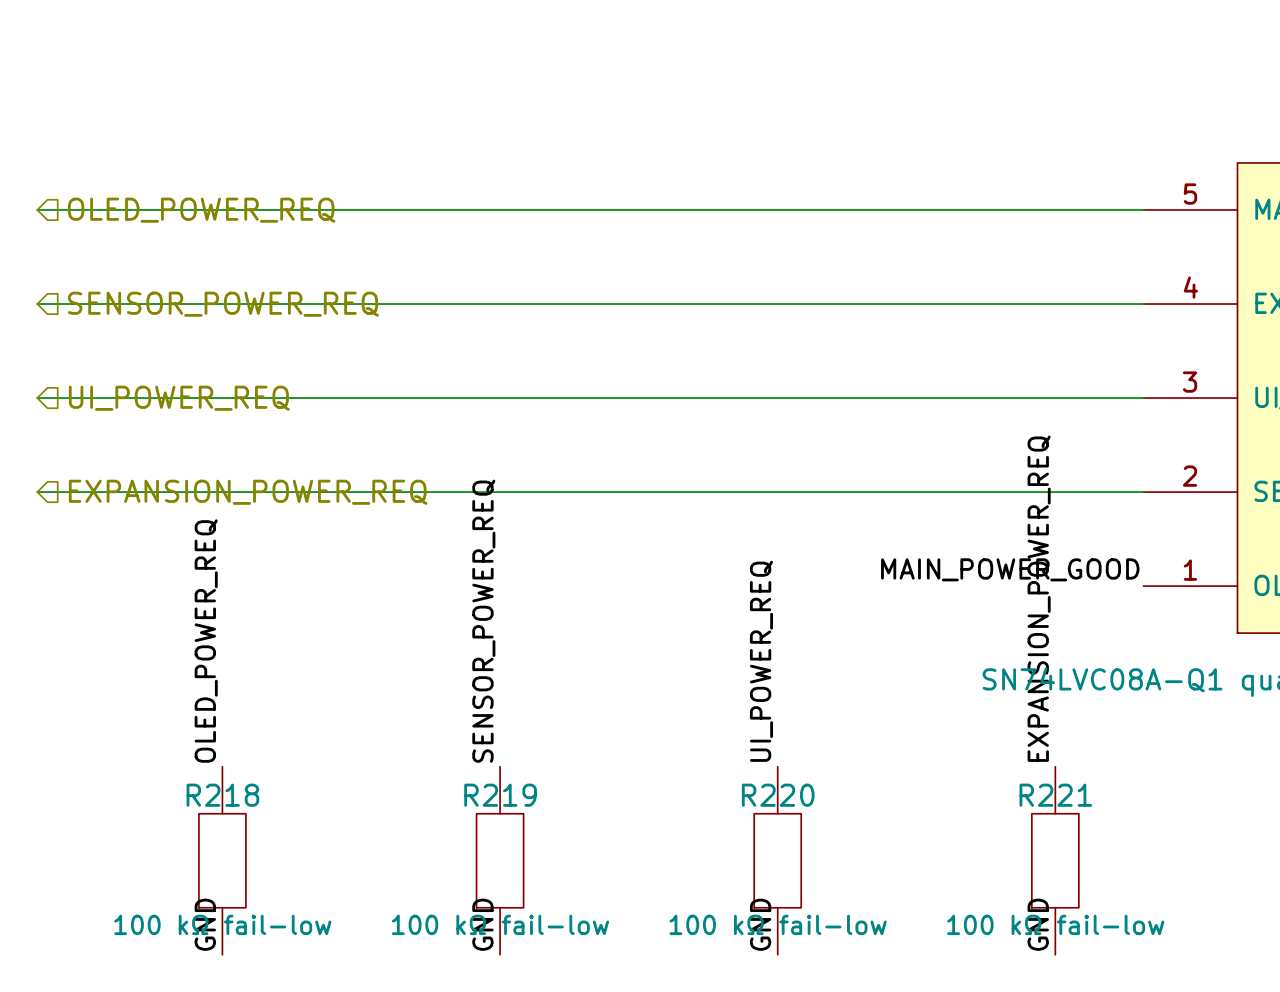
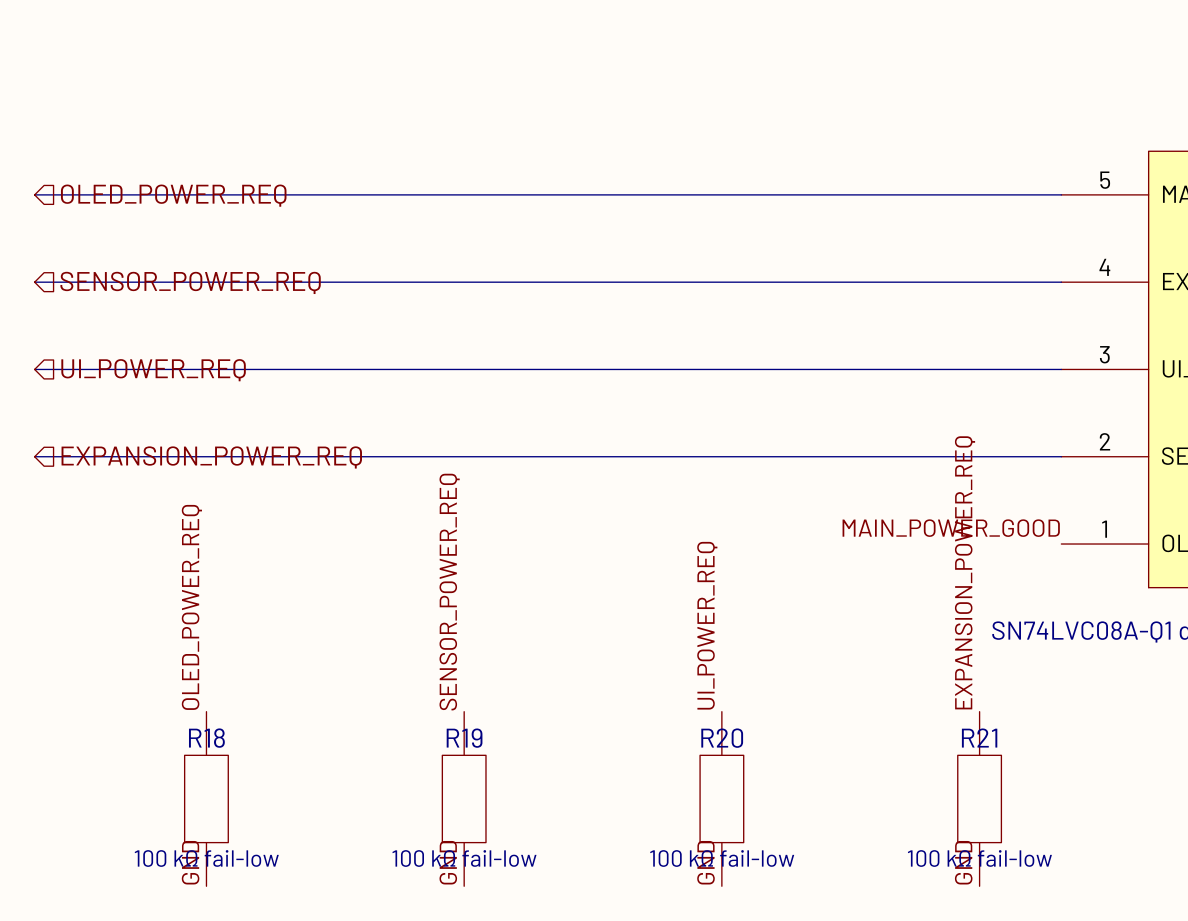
R218 name: R218 (222, 795) -> R18 (206, 738)
R219 name: R219 (500, 795) -> R19 (464, 738)
R220 name: R220 (778, 795) -> R20 (722, 738)
R221 name: R221 (1055, 795) -> R21 (979, 738)

